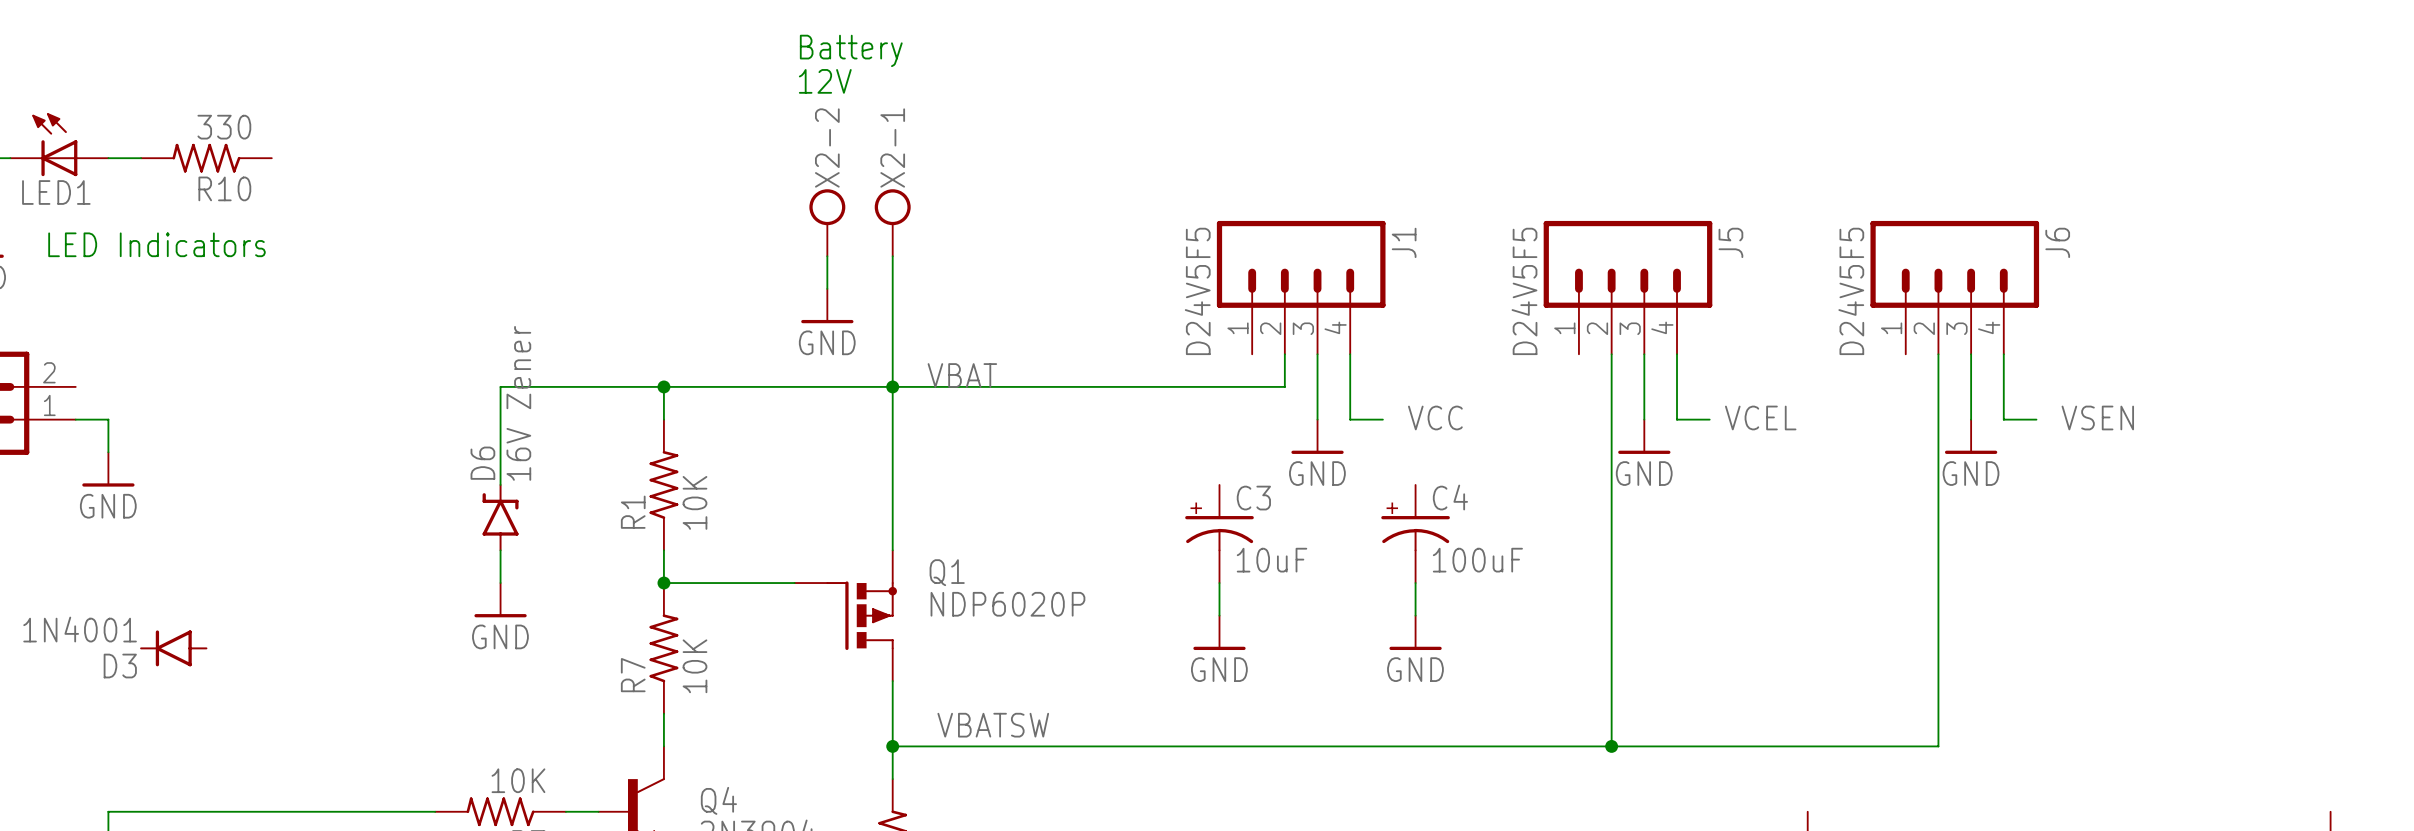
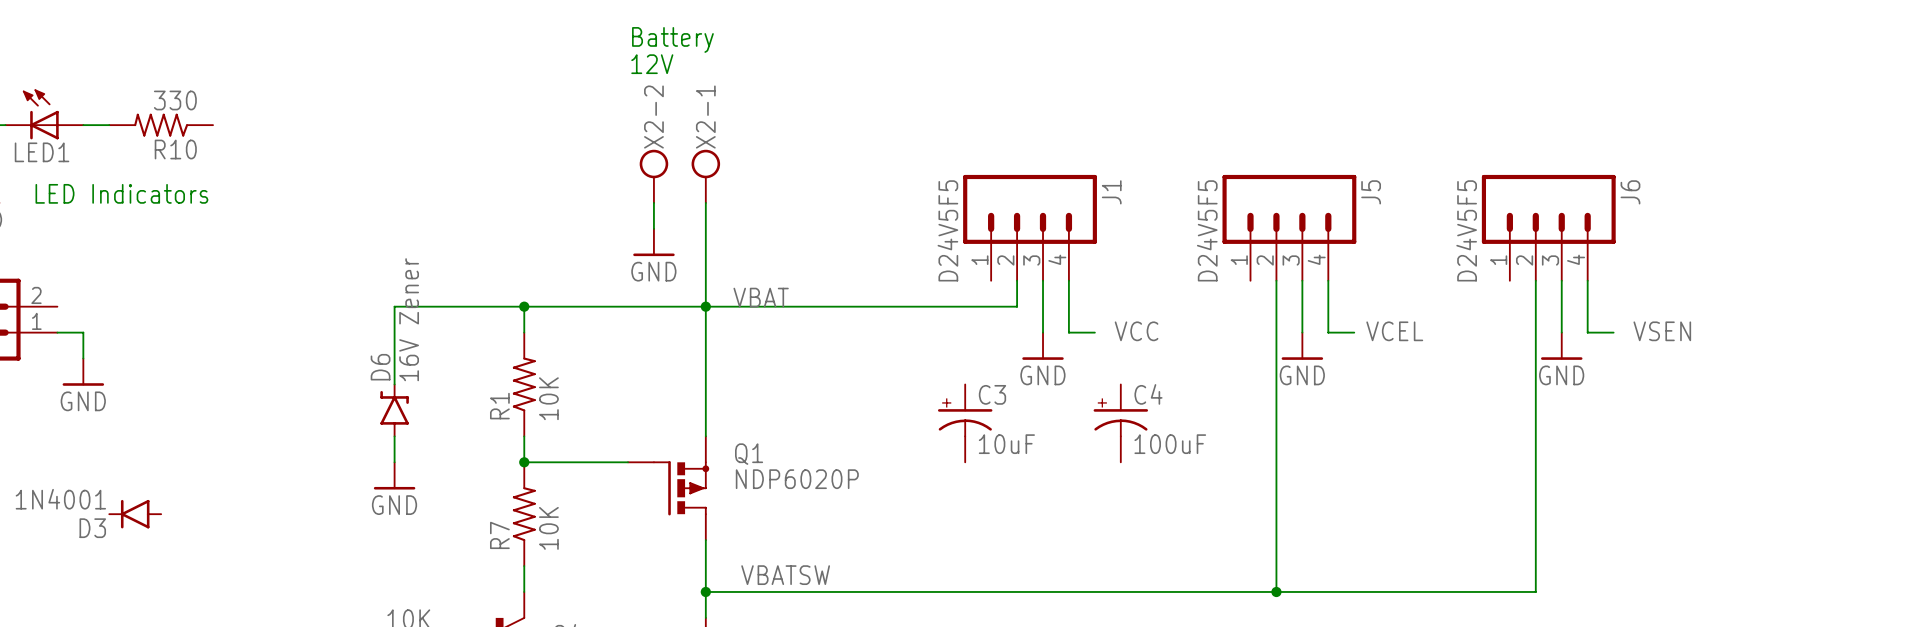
wire: (1219, 583) (1219, 615) -> none
wire: (1415, 583) (1415, 615) -> none
power symbol: GND (1219, 632) -> none
power symbol: GND (1415, 632) -> none

